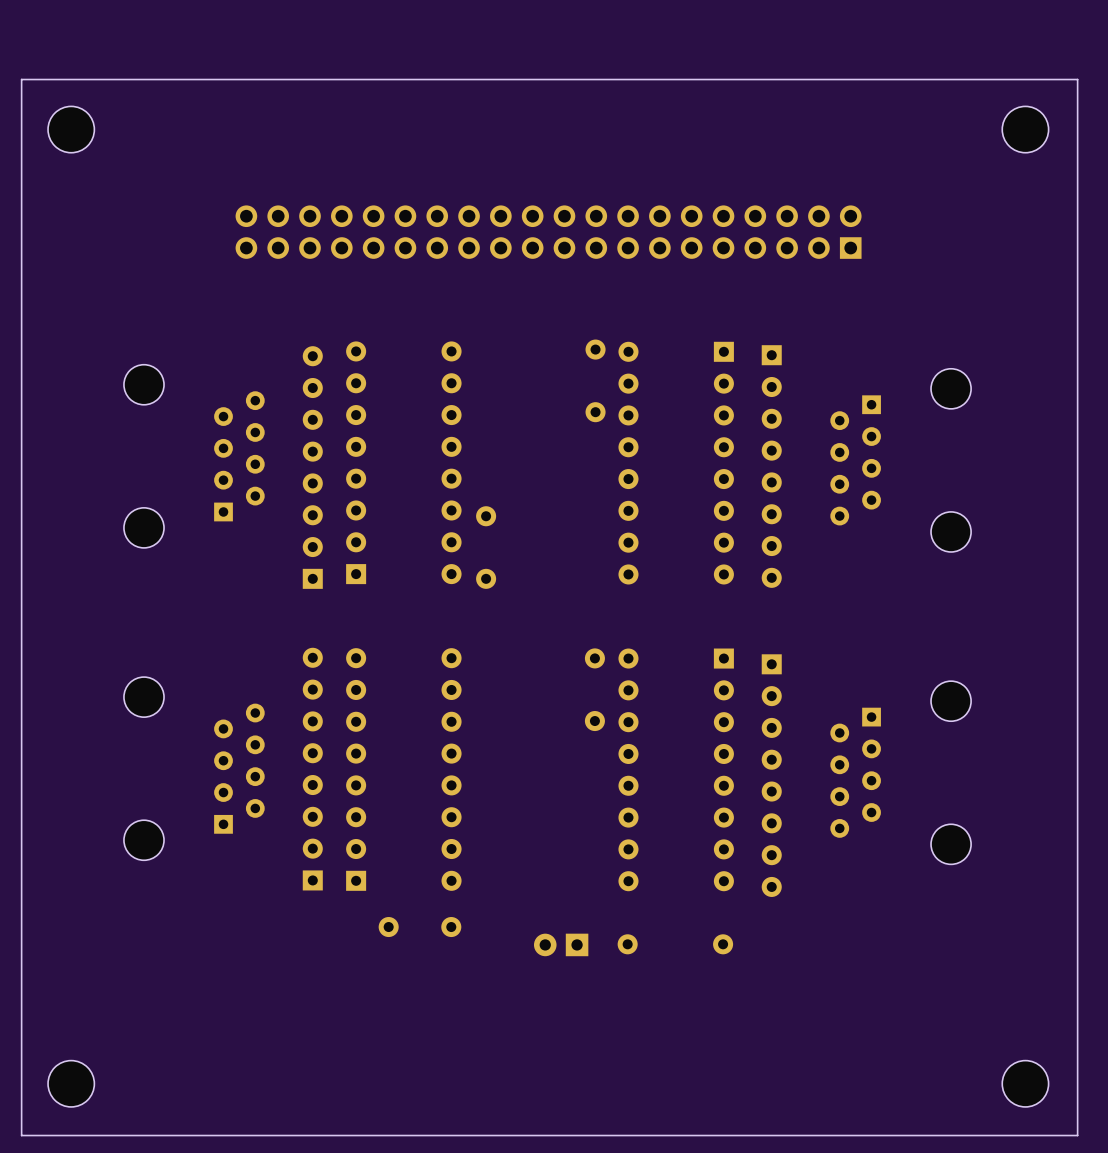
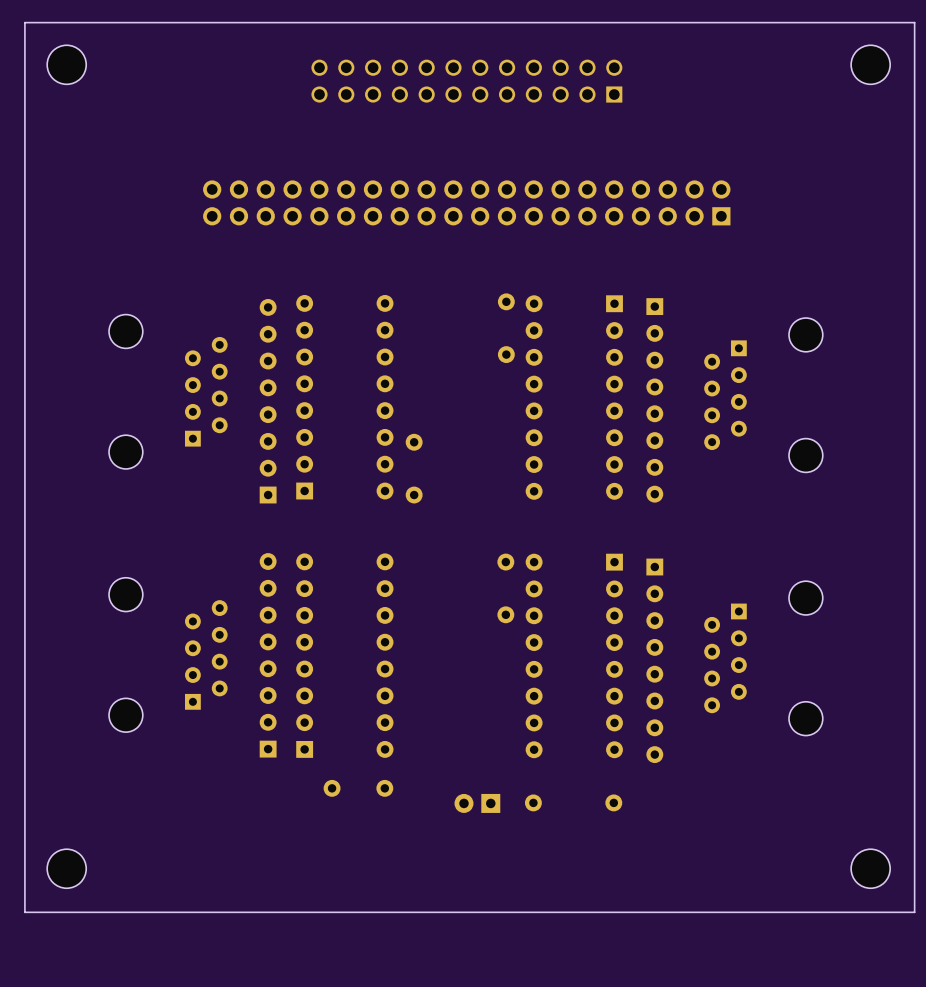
board edge: (1077, 79) (21, 79) (21, 1135) (1077, 1135) (1077, 79) -> (914, 22) (24, 22) (24, 912) (914, 912) (914, 22)
part: none -> (466, 81)
part position: (71, 129) -> (66, 64)
part position: (1025, 129) -> (870, 64)
part position: (71, 1083) -> (66, 868)
part position: (1025, 1083) -> (870, 868)

